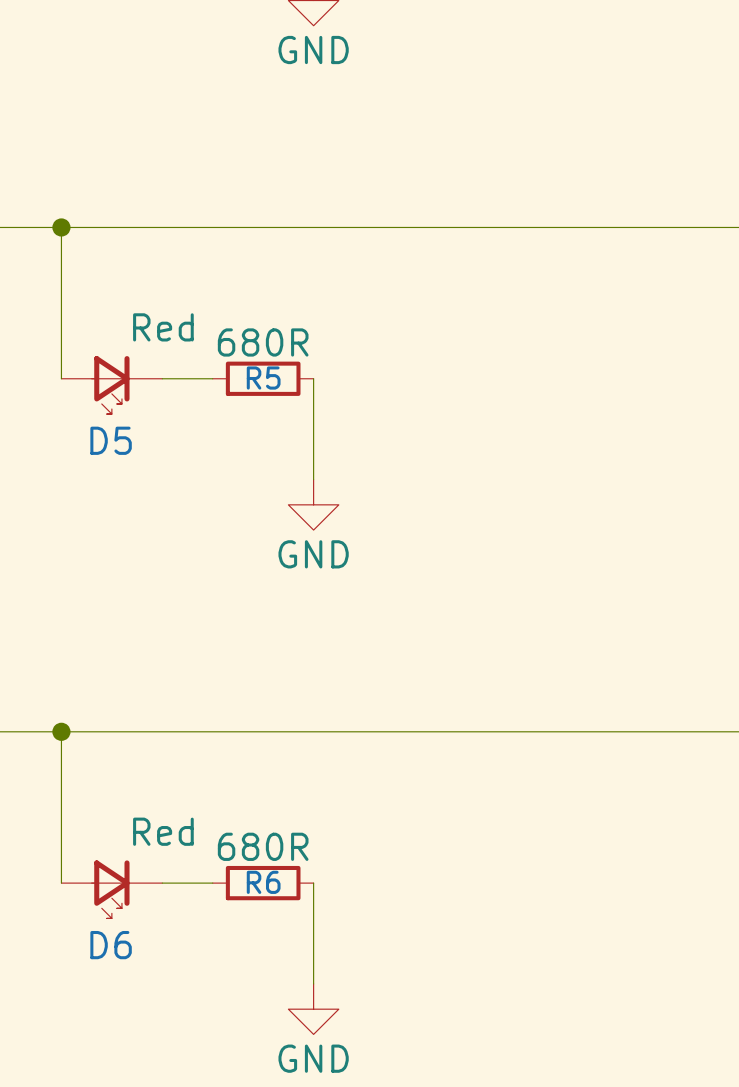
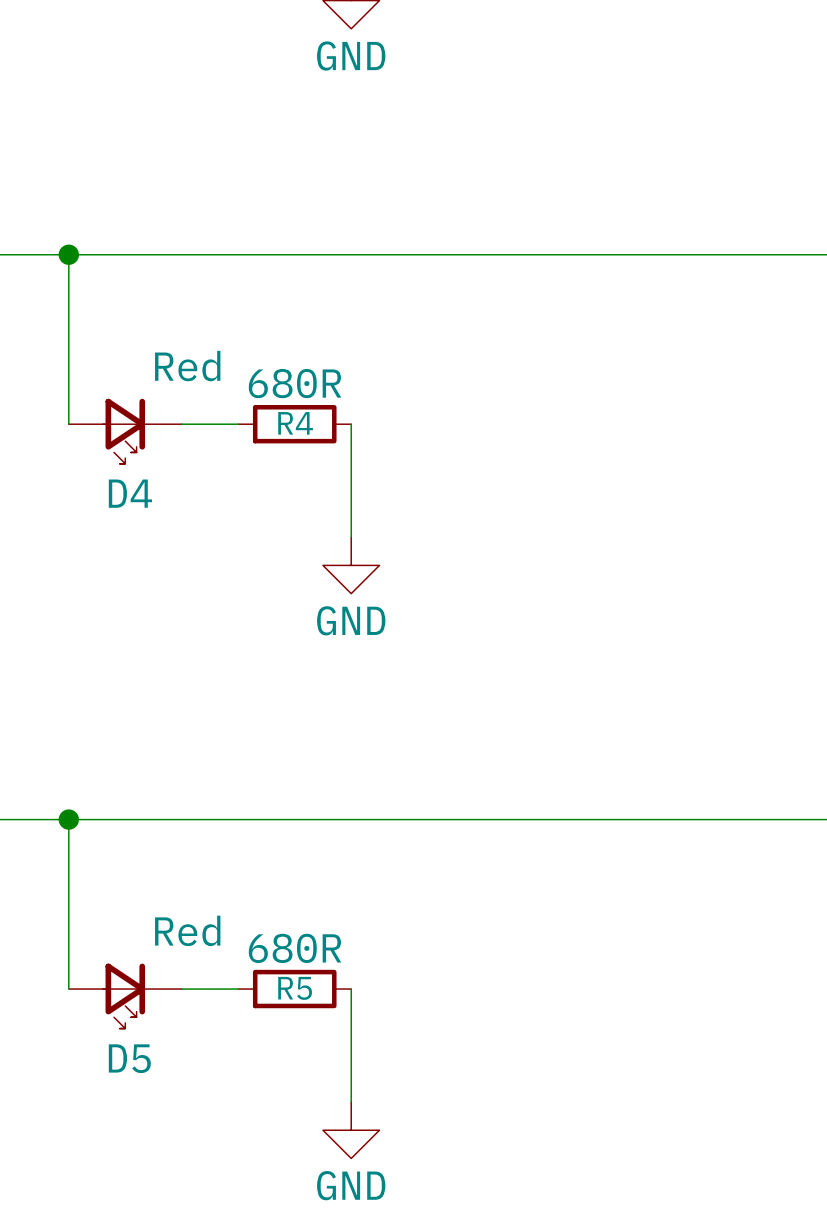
R5 name: R5 (263, 378) -> R4 (295, 423)
D5 name: D5 (111, 440) -> D4 (130, 493)
R6 name: R6 (263, 882) -> R5 (295, 988)
D6 name: D6 (111, 945) -> D5 (129, 1058)

